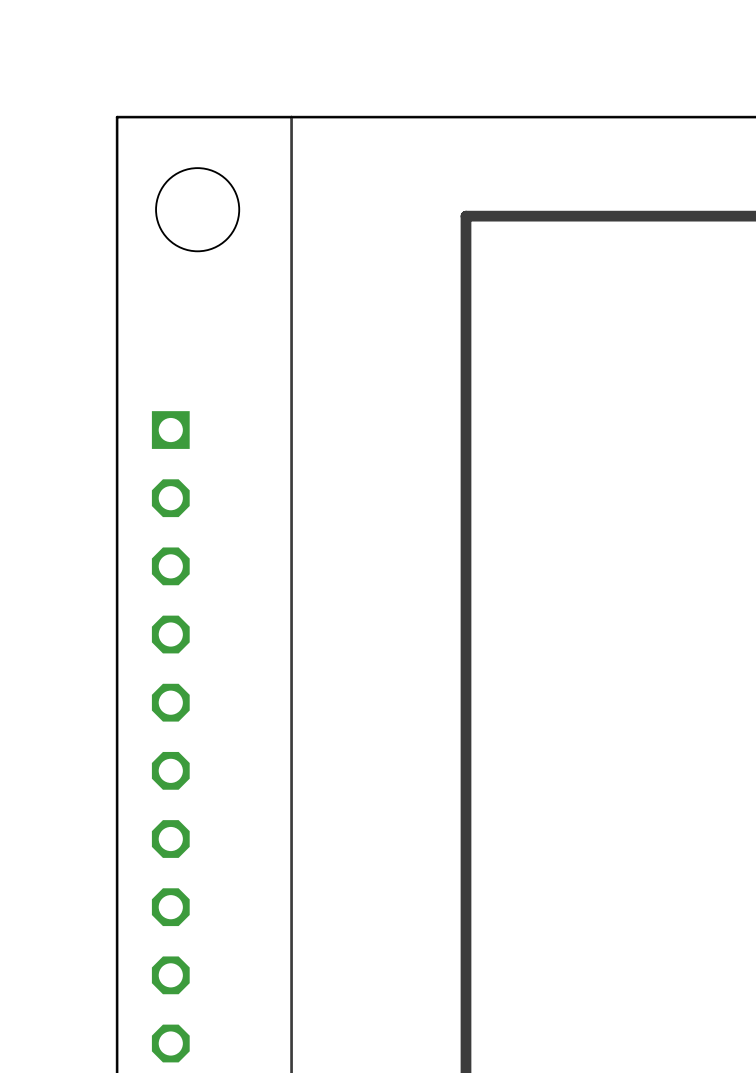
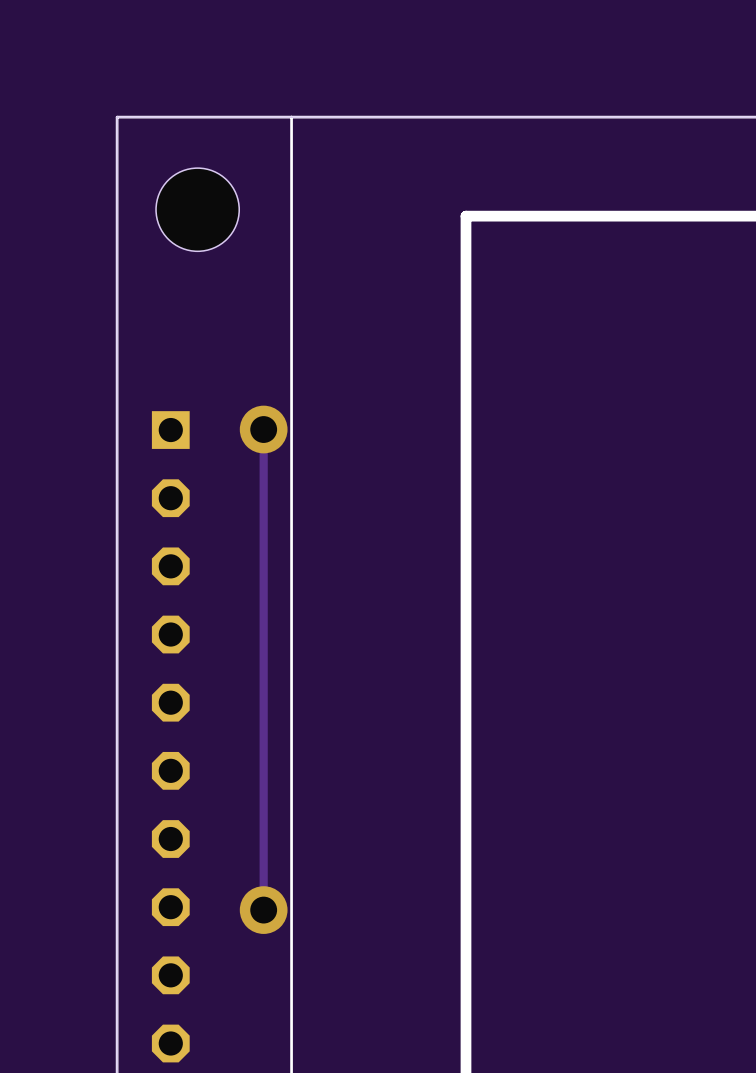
track: none -> (263, 429) (263, 910)
via: none -> (263, 429)
via: none -> (263, 910)

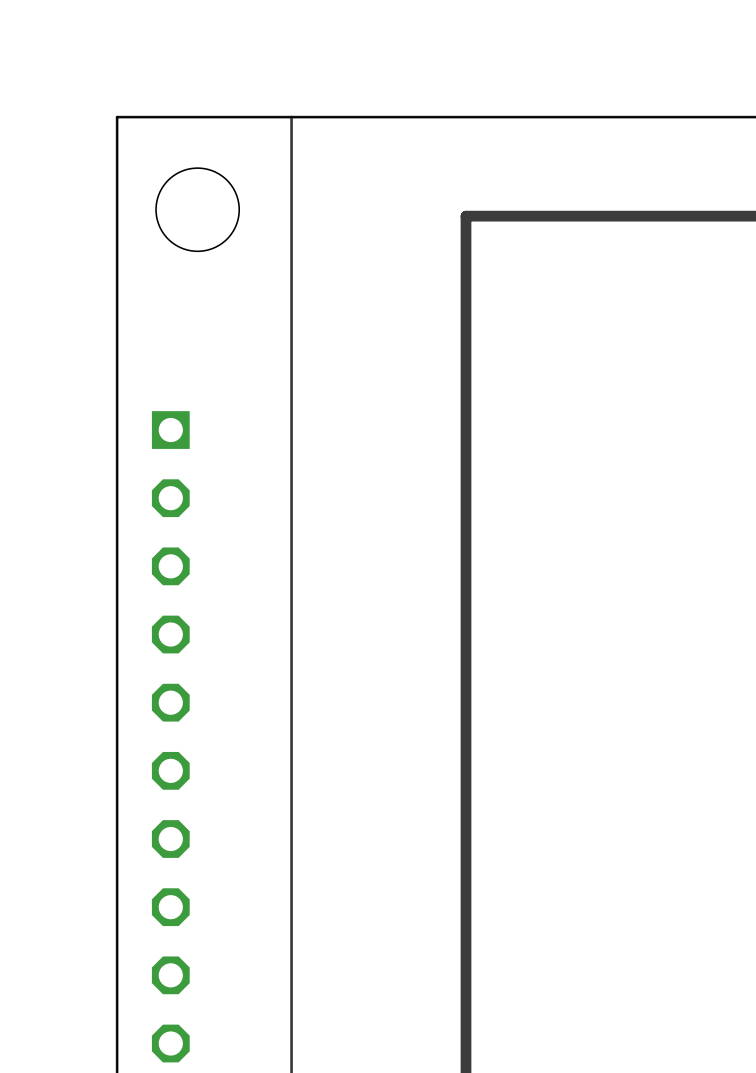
track: (263, 429) (263, 910) -> none
via: (263, 429) -> none
via: (263, 910) -> none

